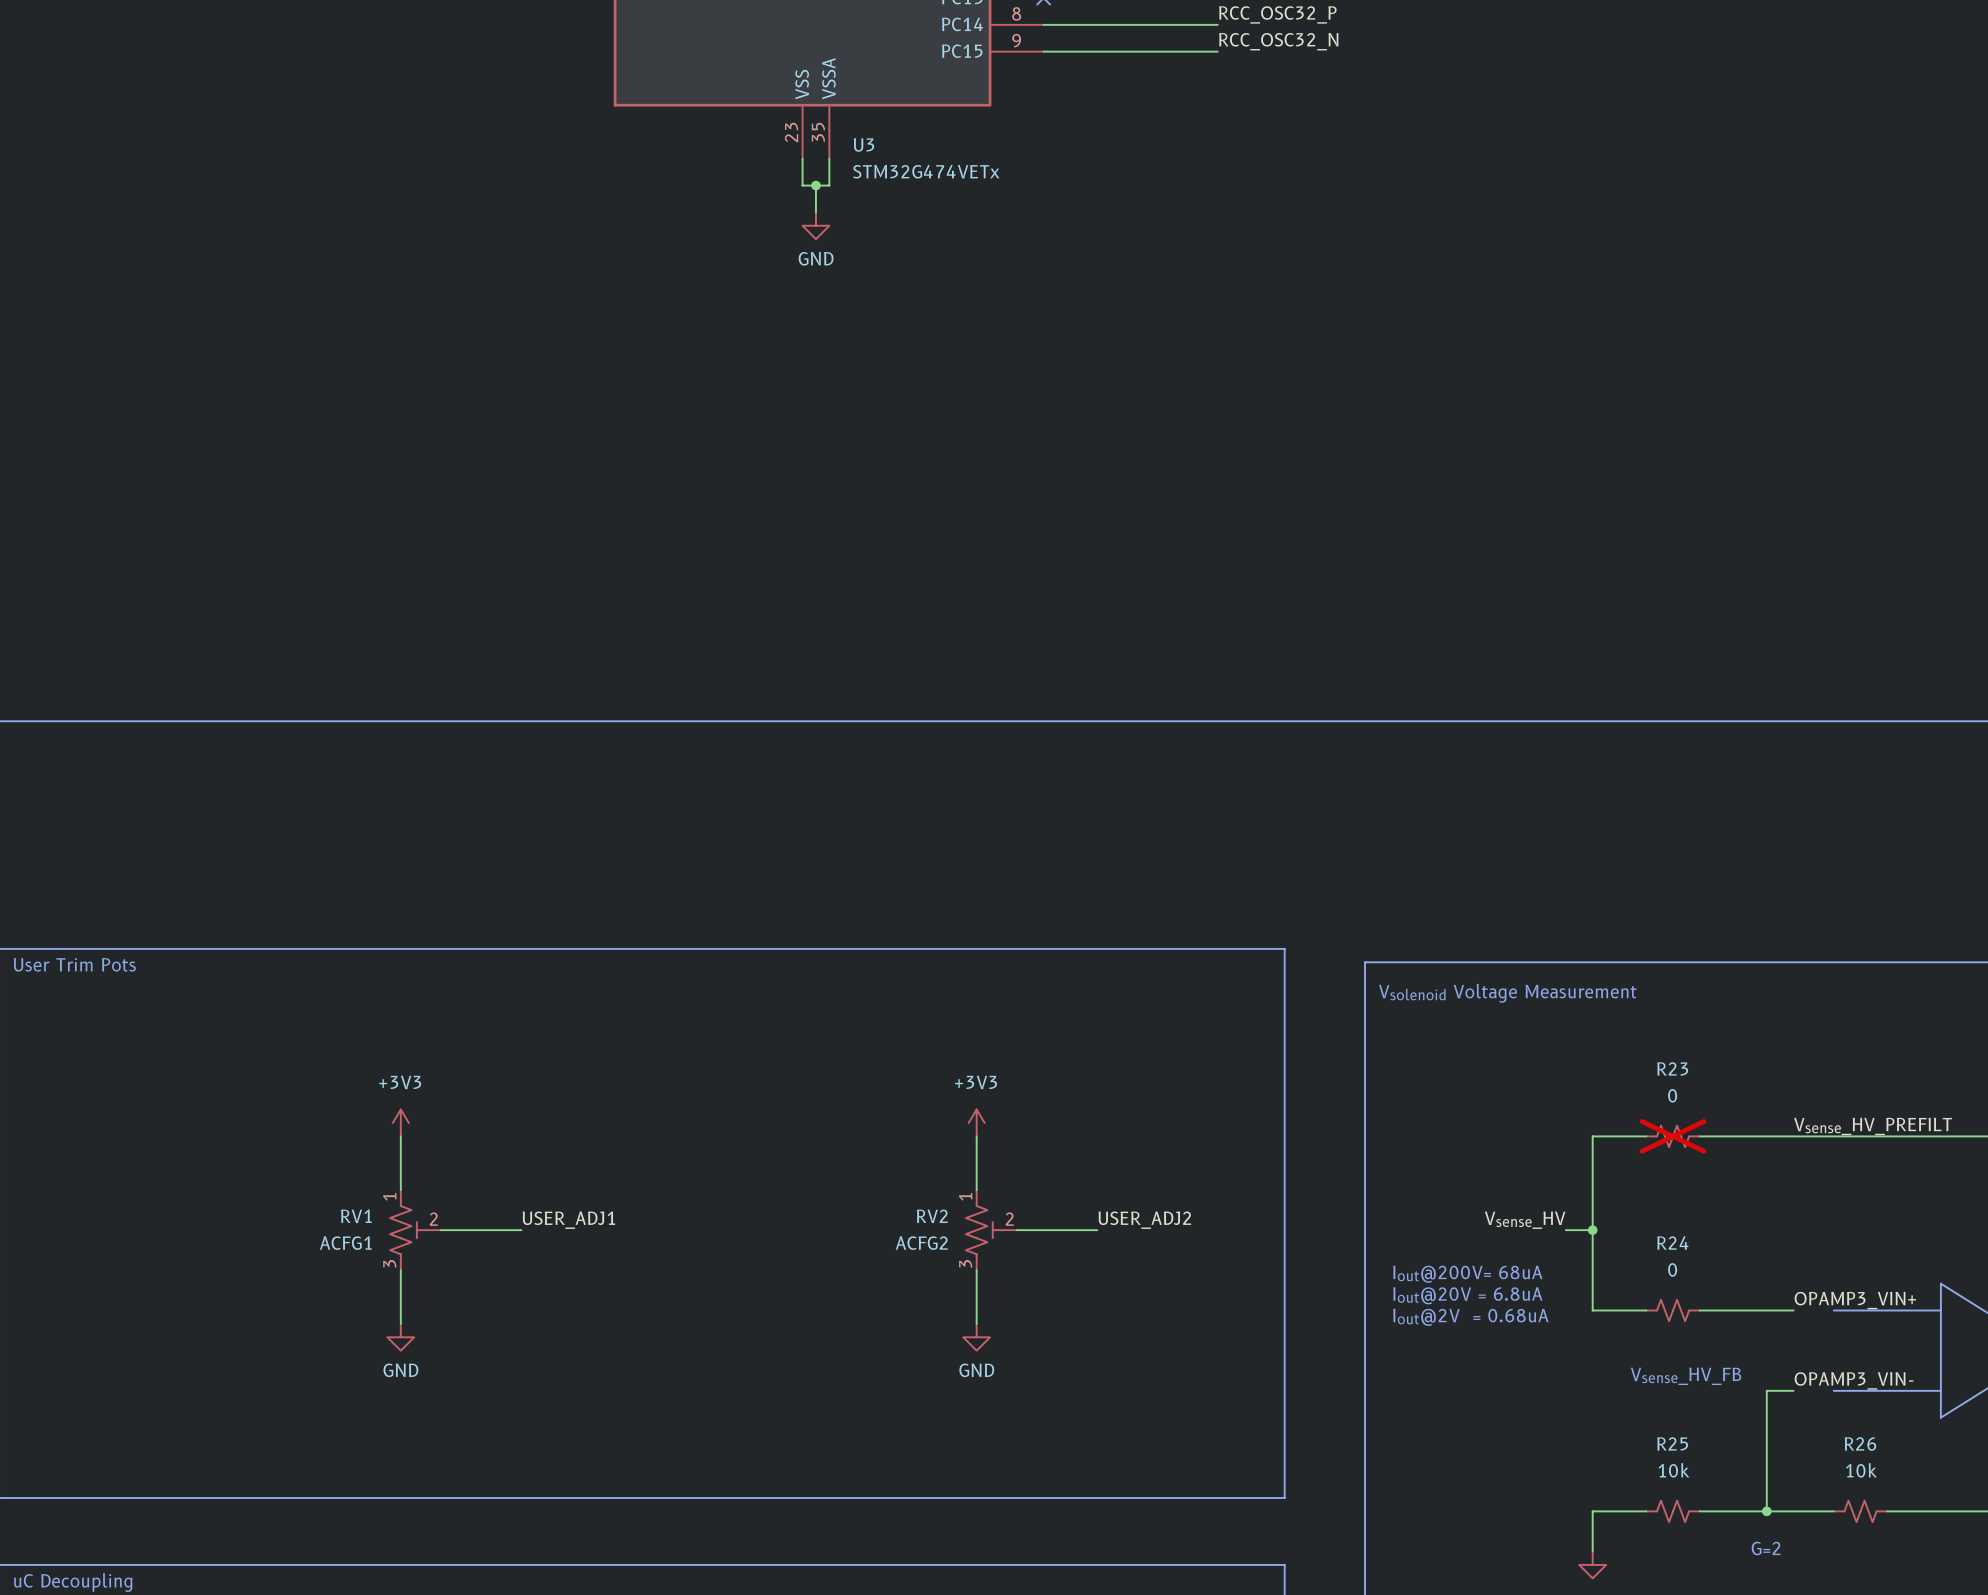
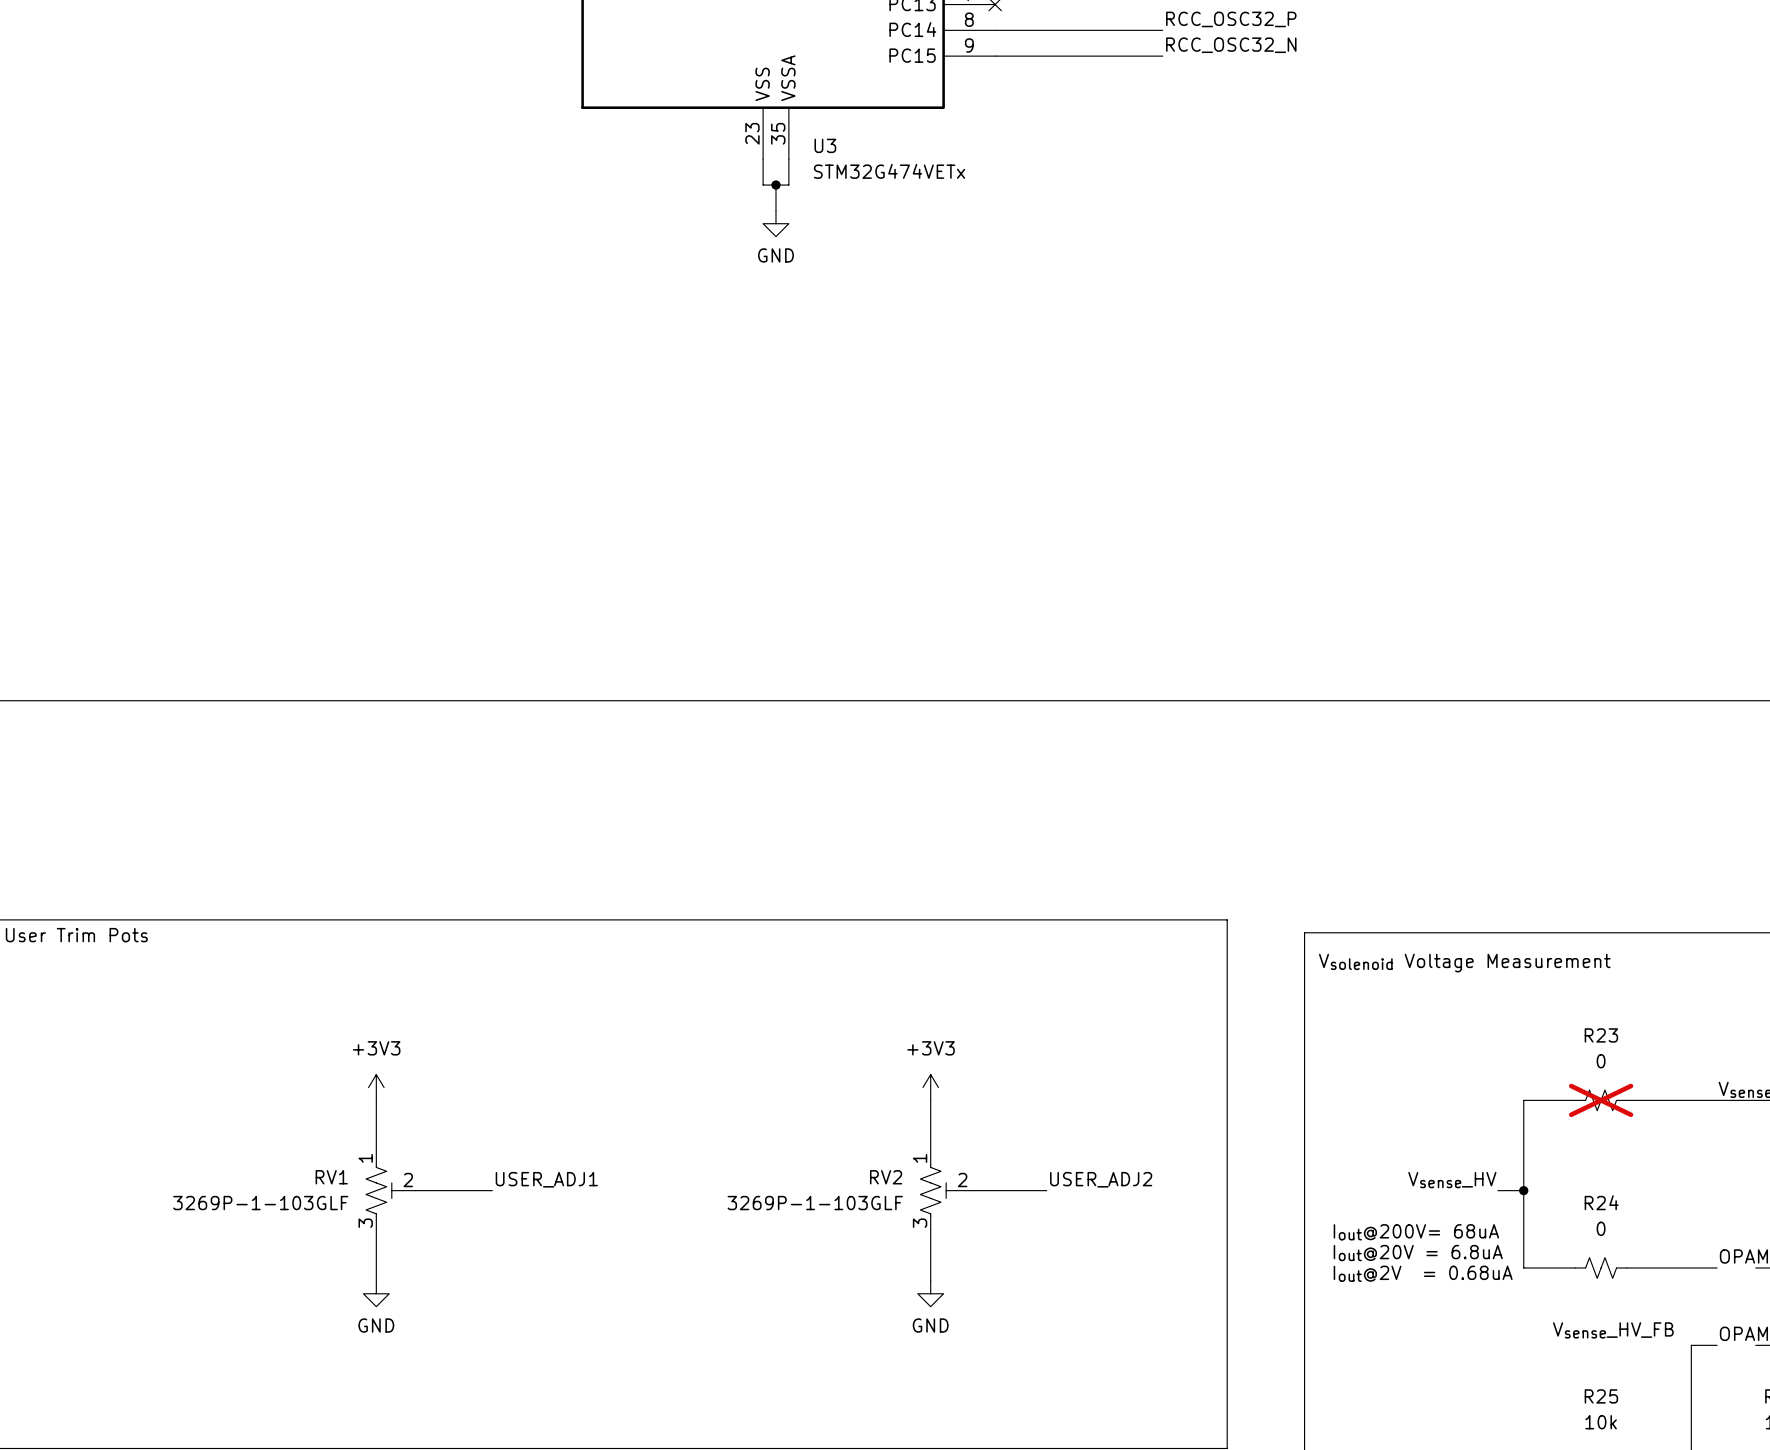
RV1 value: ACFG1 (345, 1243) -> 3269P-1-103GLF (260, 1203)
RV2 value: ACFG2 (921, 1243) -> 3269P-1-103GLF (815, 1203)

